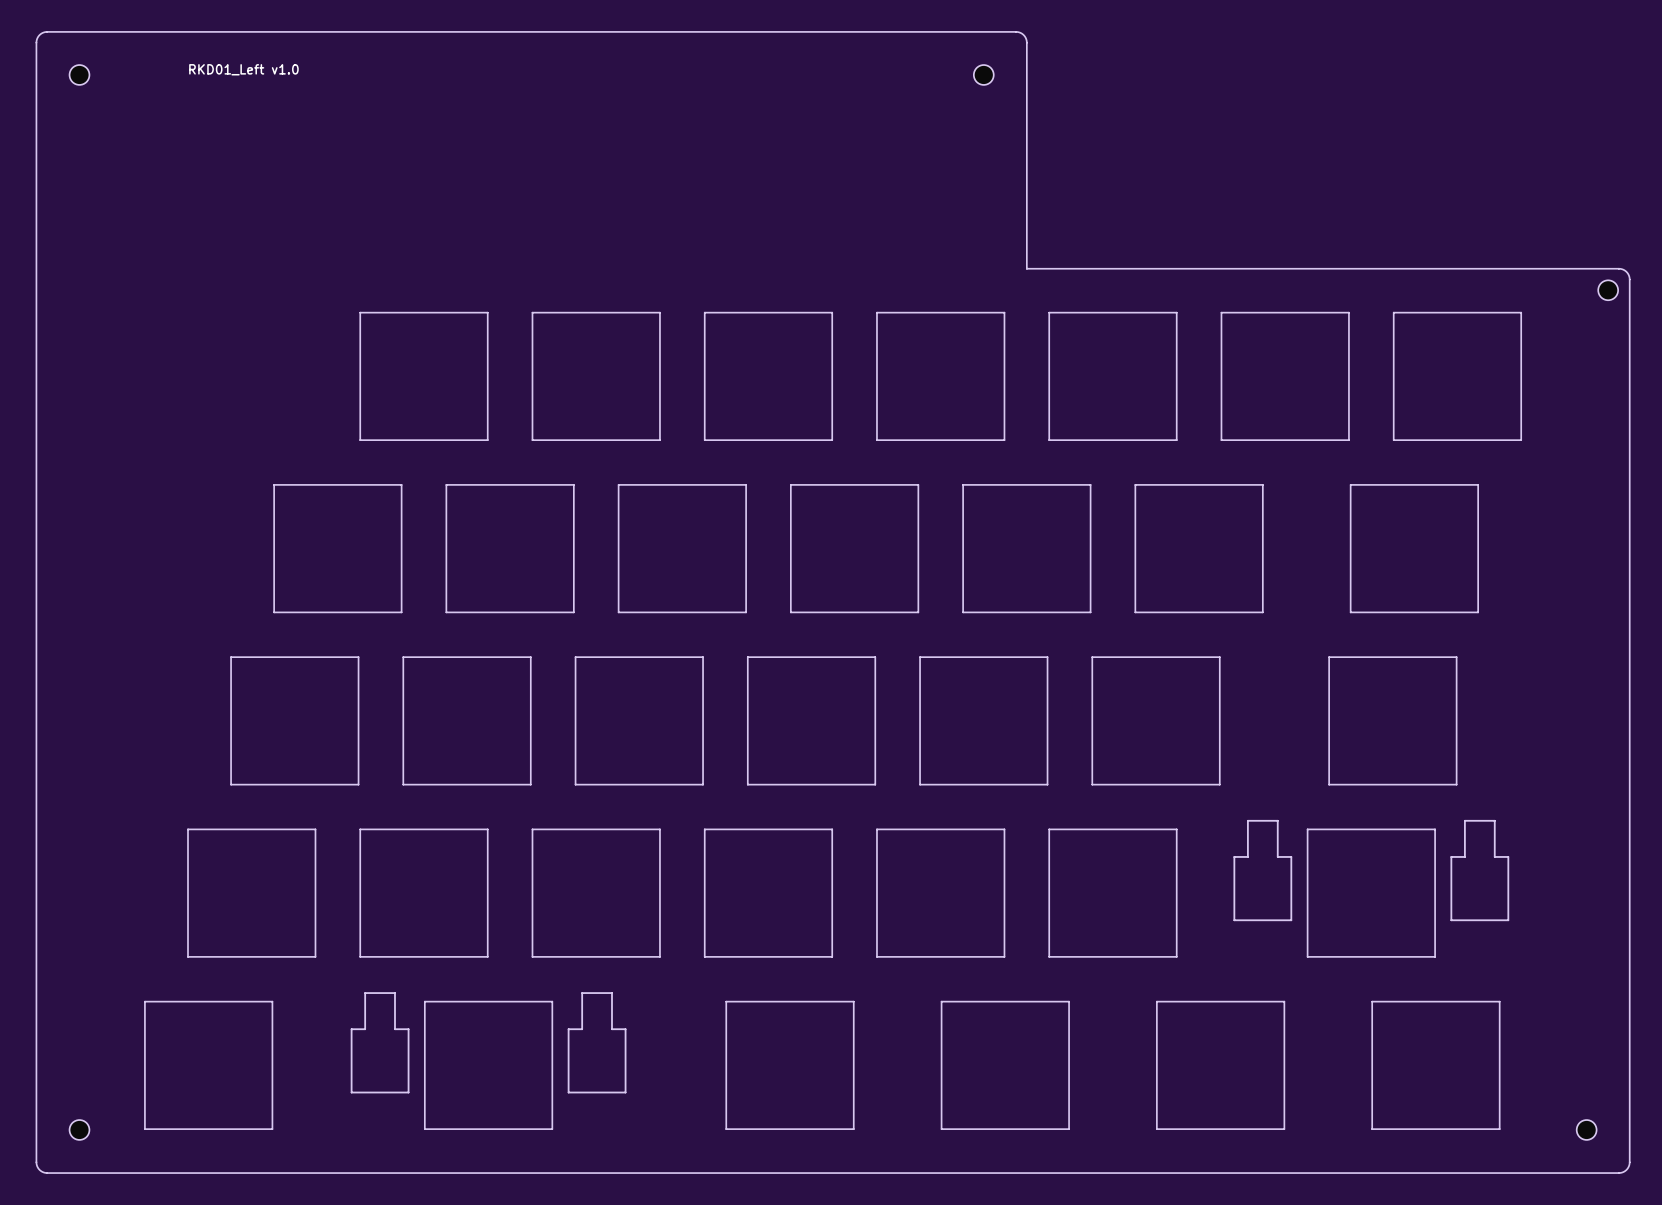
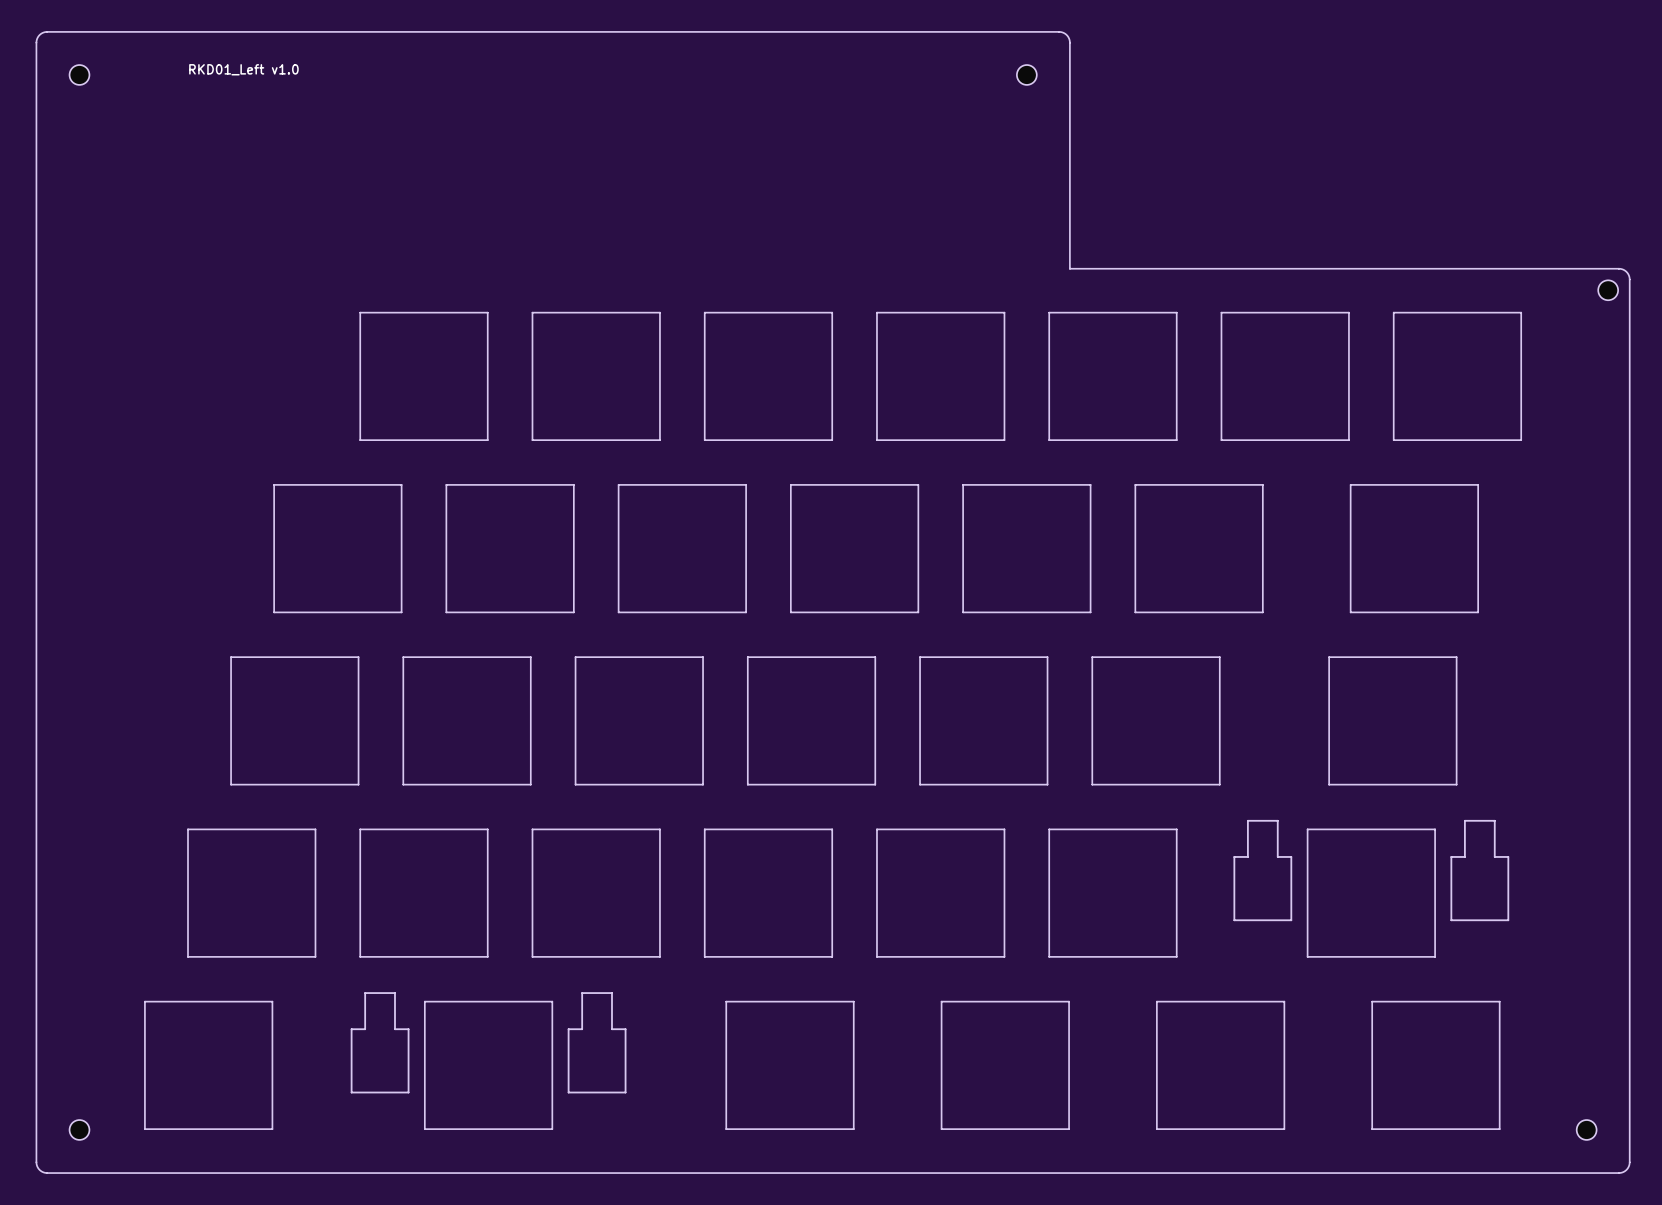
board edge: (1016, 31) (1023, 35) (1026, 42) (1026, 268) (1069, 268) -> (1016, 31) (1060, 32) (1066, 35) (1069, 39) (1069, 268)
part position: (983, 74) -> (1026, 74)

